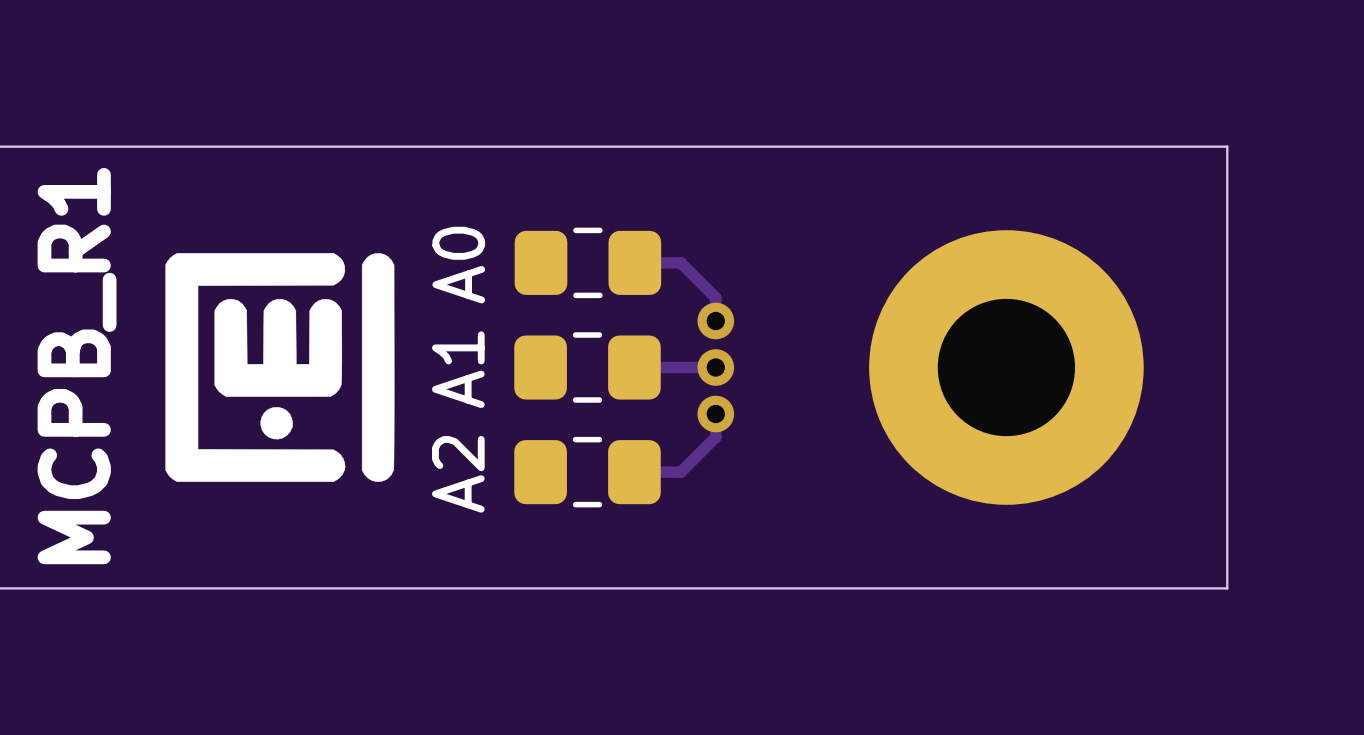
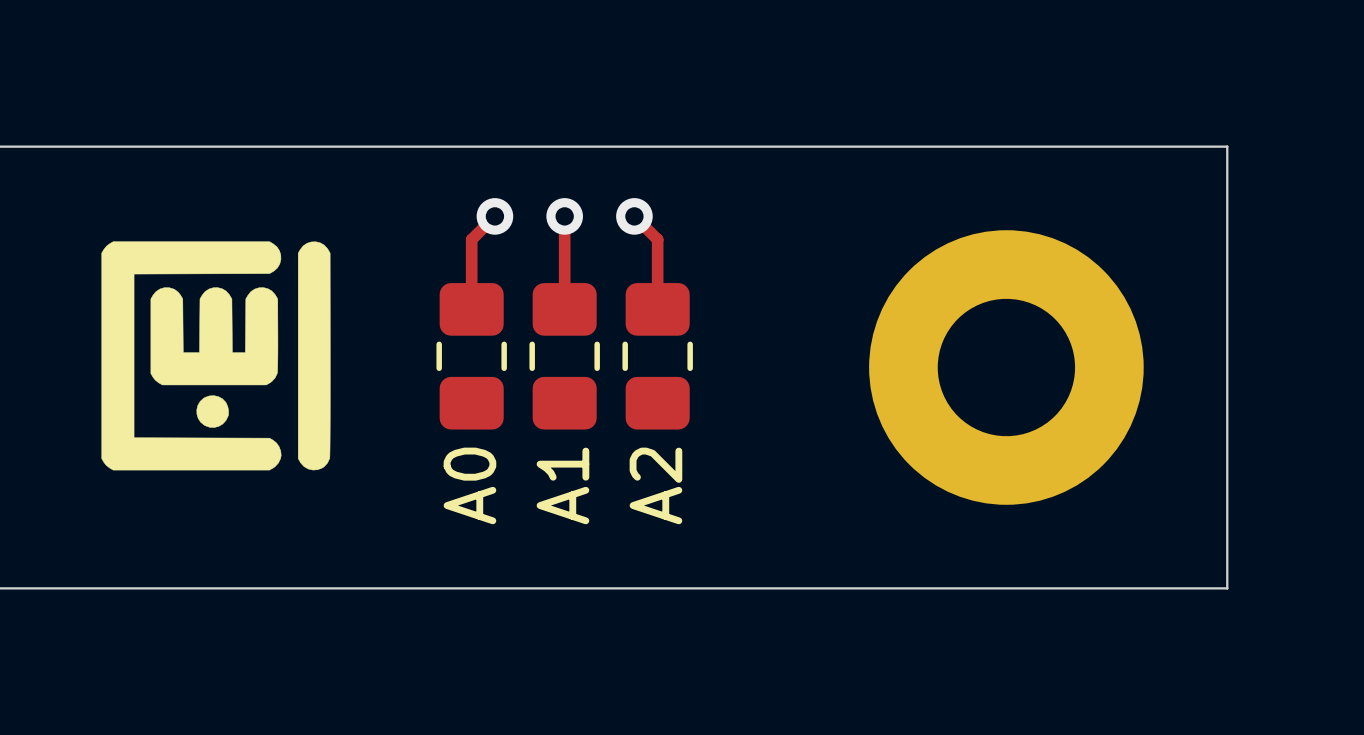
track: none -> (494, 216) (471, 239) (471, 309)
via: none -> (494, 216)
track: none -> (564, 216) (564, 309)
via: none -> (564, 216)
track: none -> (634, 216) (657, 239) (657, 309)
via: none -> (634, 216)
A0 rotation: 0° (587, 262) -> 90° clockwise (471, 356)
A0 position: (587, 262) -> (471, 356)
track: (634, 262) (680, 262) (715, 297) (715, 321) -> none
A0 name position: A0 (458, 265) -> A0 (469, 485)
via: (715, 321) -> none
text: MCPB_R1 (77, 366) -> none
drawing position: (279, 367) -> (216, 355)
A1 rotation: 0° (587, 367) -> 90° clockwise (564, 356)
track: (634, 367) (715, 367) -> none
via: (715, 367) -> none
A1 name position: A1 (458, 369) -> A1 (562, 485)
track: (715, 414) (715, 437) (680, 472) (634, 472) -> none
via: (715, 414) -> none
A2 rotation: 0° (587, 472) -> 90° clockwise (657, 356)
A2 position: (587, 472) -> (657, 356)
A2 name position: A2 (458, 474) -> A2 (655, 485)

